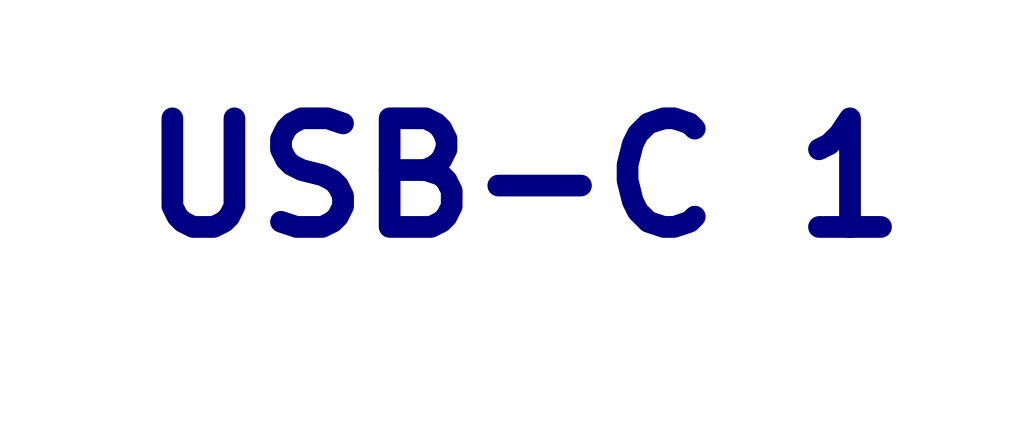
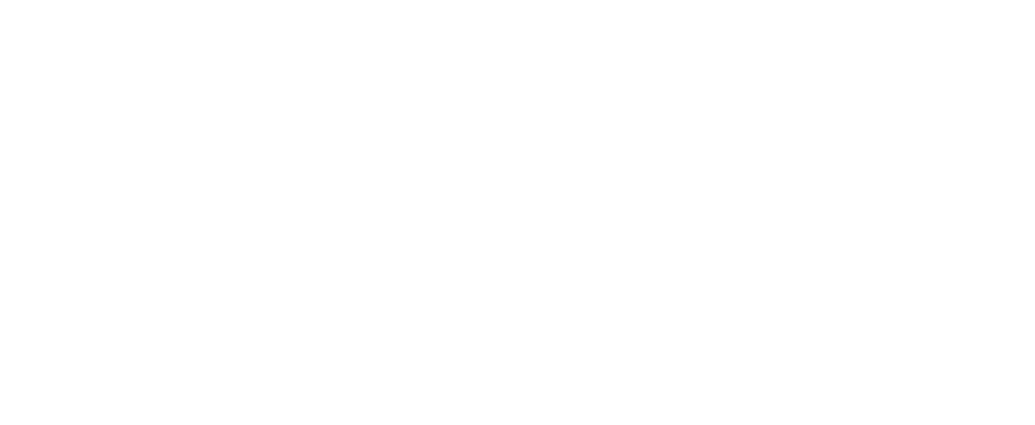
text: USB-C 1 (526, 172) -> none

